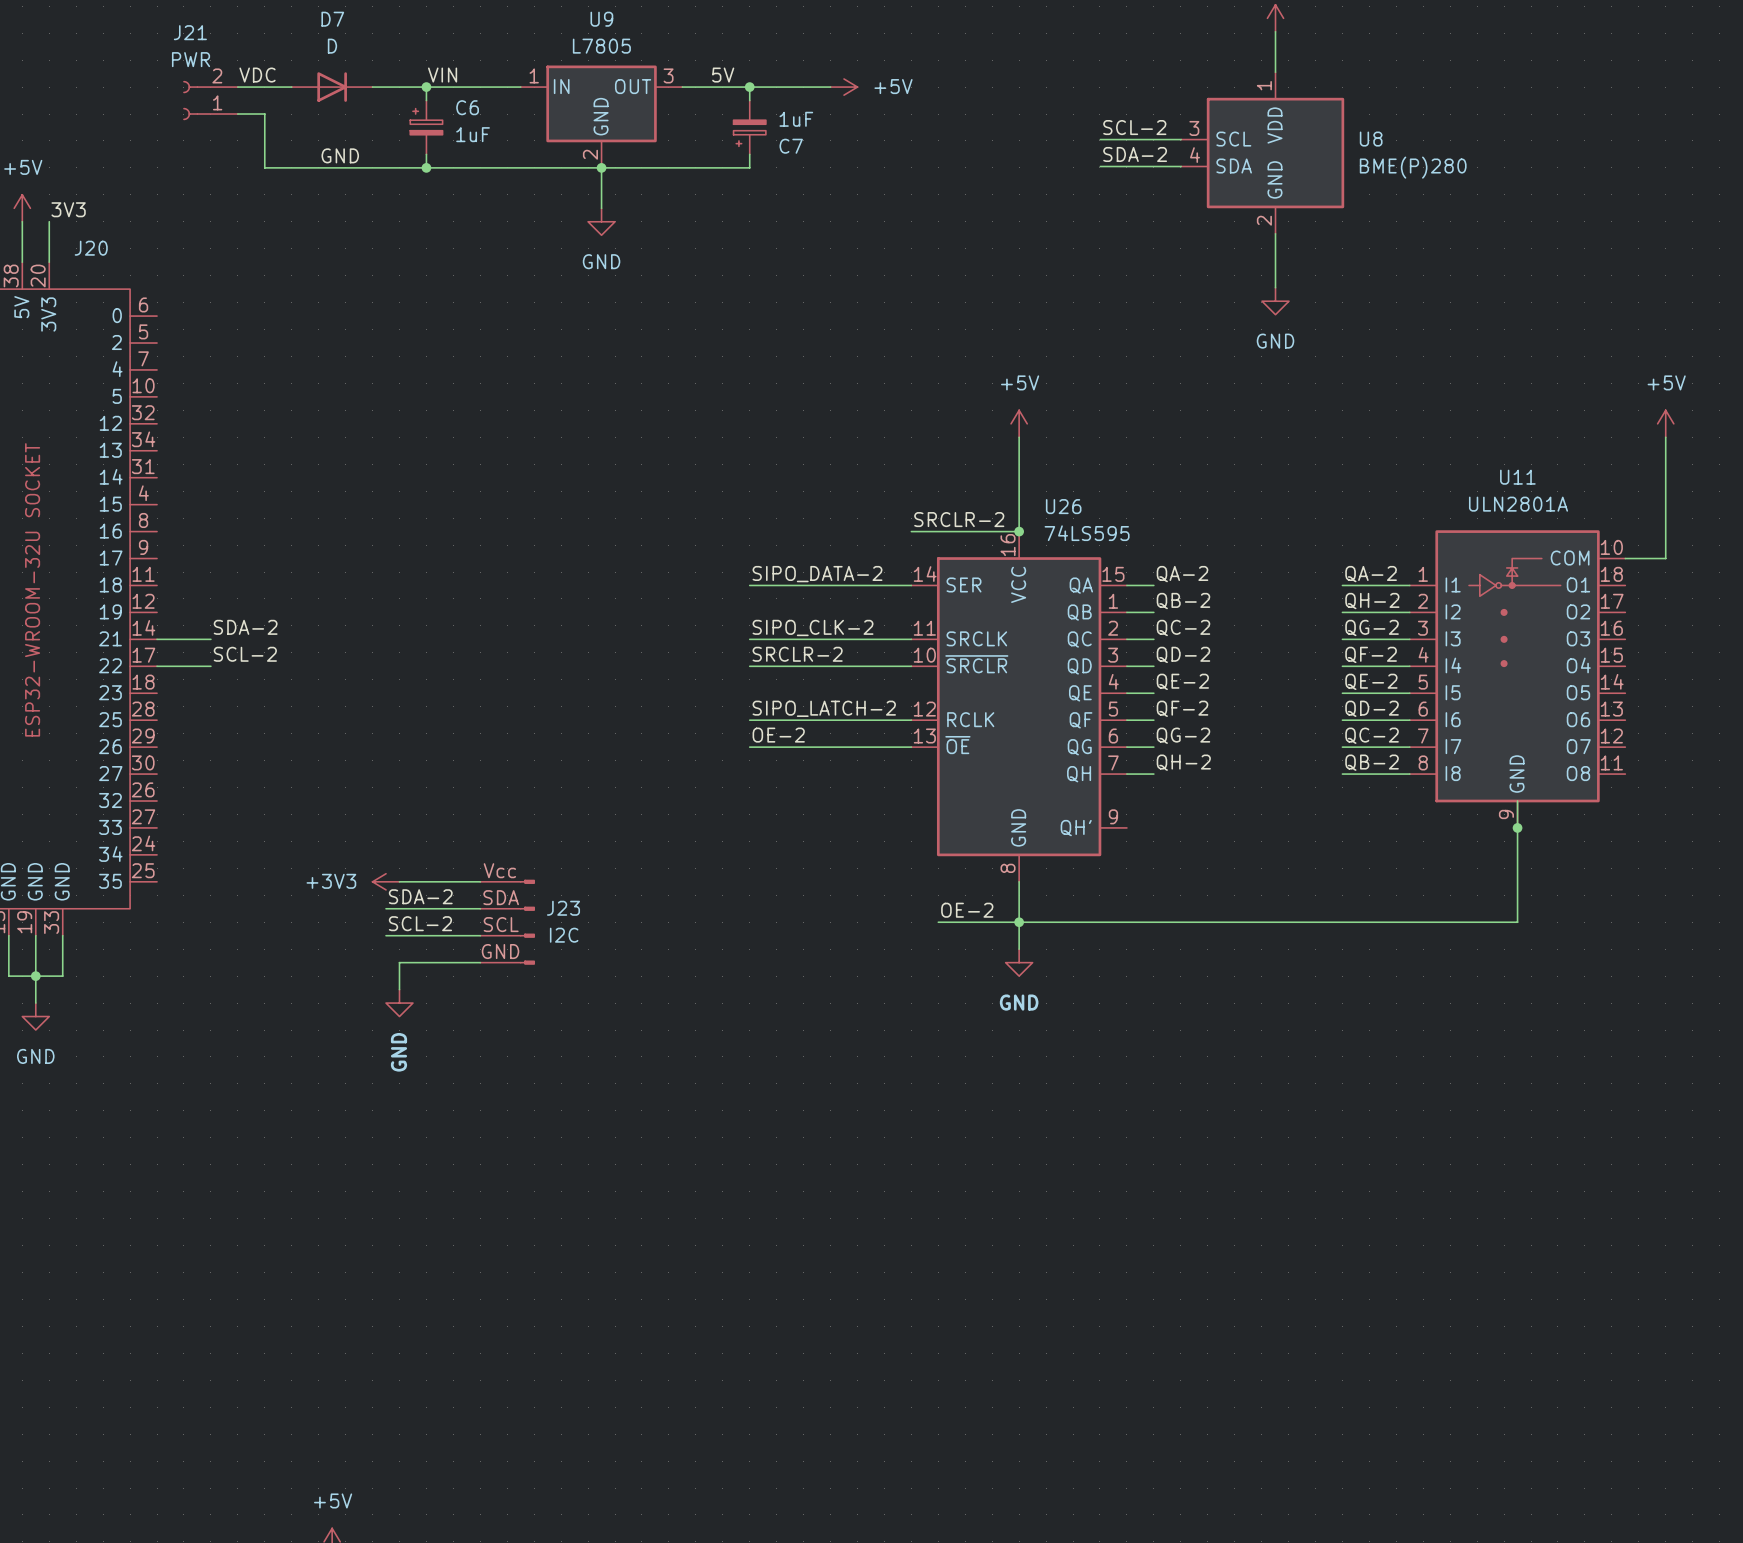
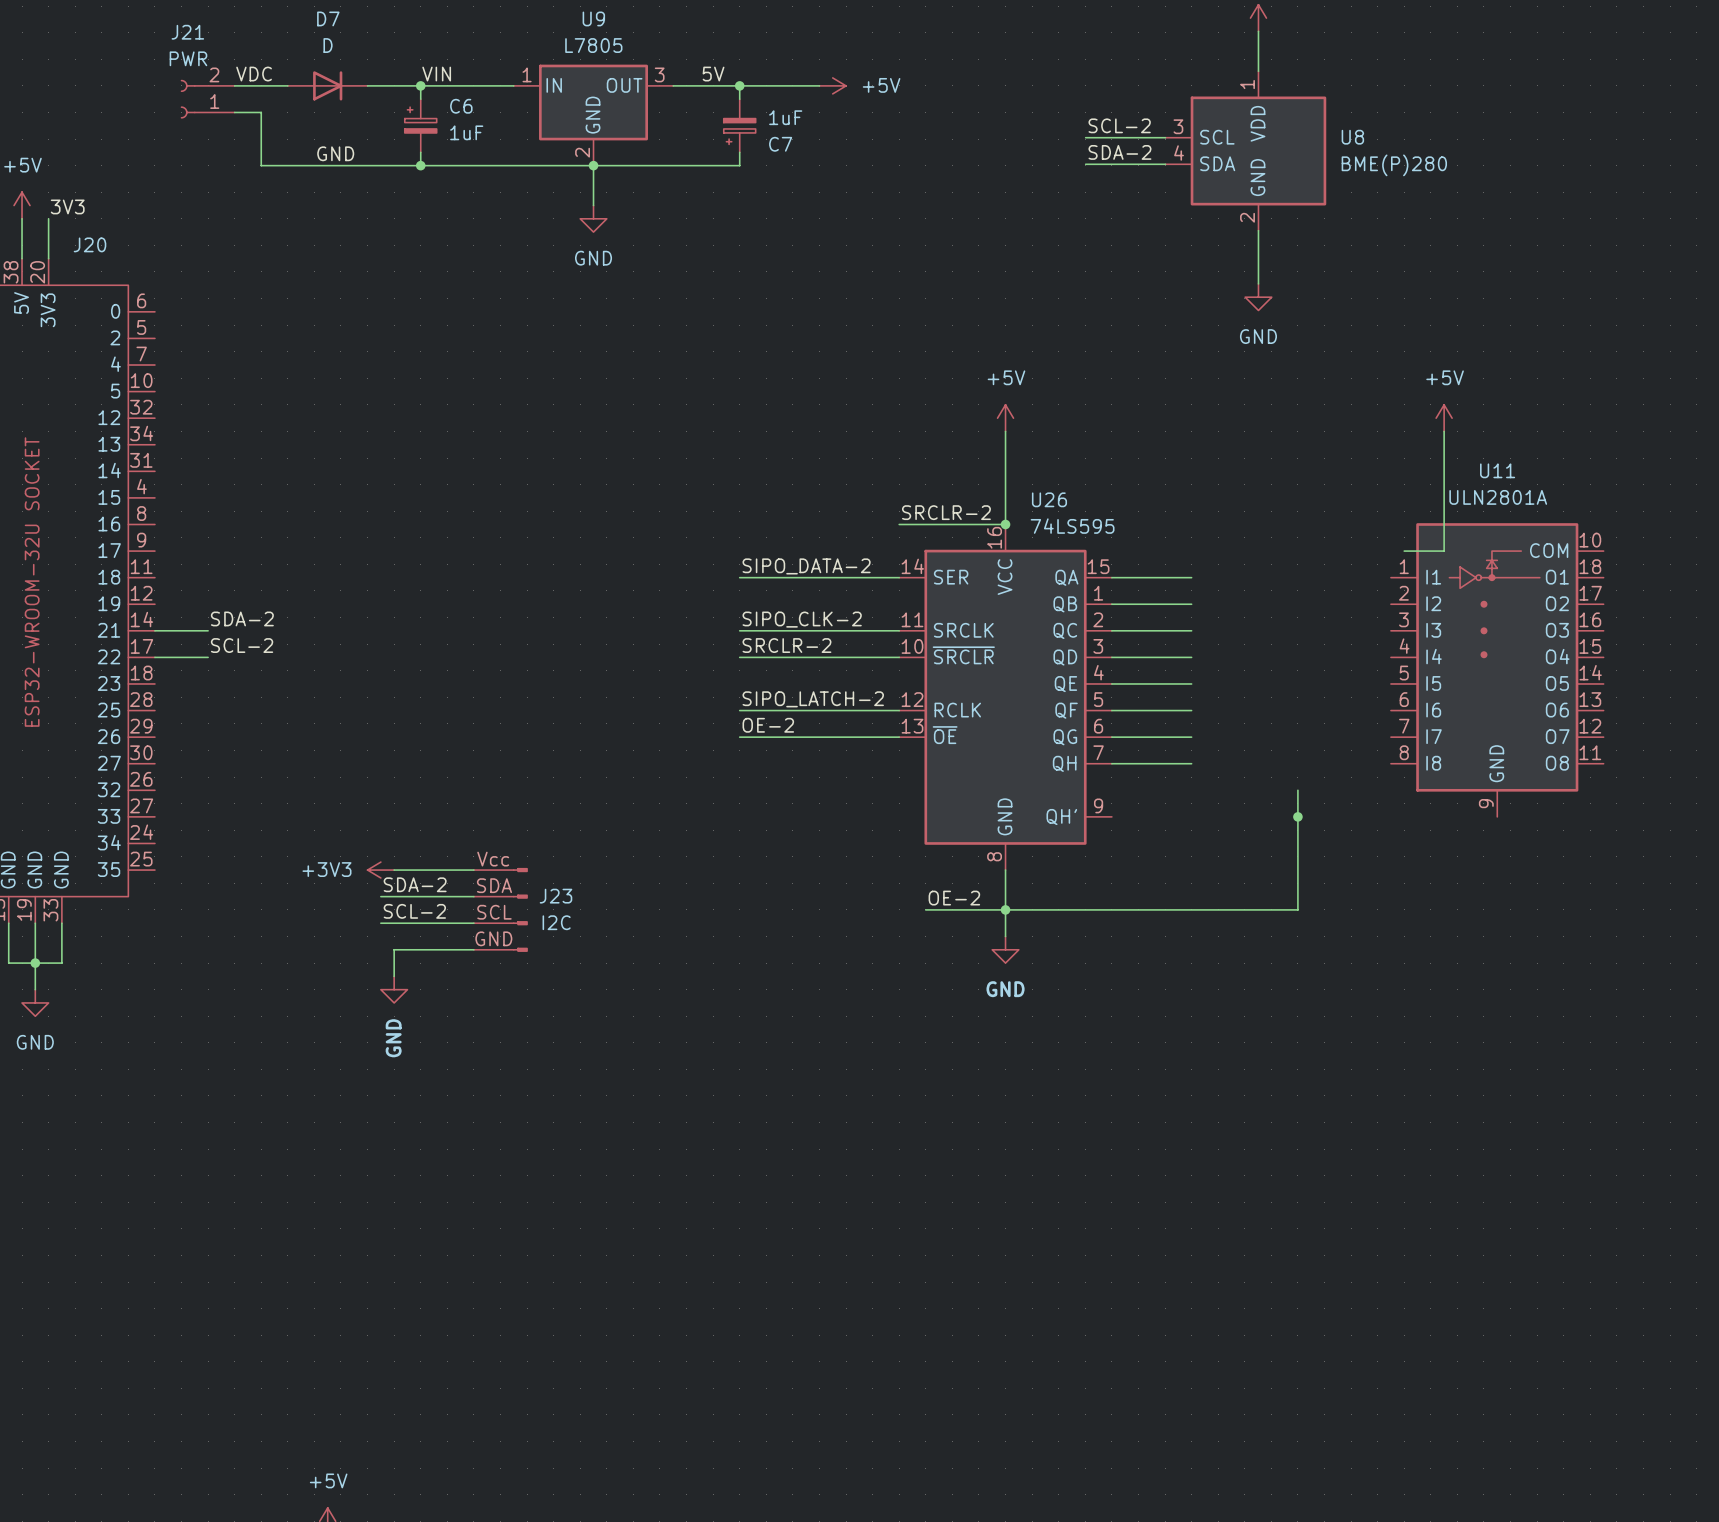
power symbol position: +5V (1665, 423) -> +5V (1444, 418)
wire: (1665, 437) (1665, 558) (1625, 558) -> (1444, 431) (1444, 551) (1404, 551)
label: QA-2 (1182, 574) -> none
label: QA-2 (1371, 574) -> none
wire: none -> (1138, 577) (1191, 577)
wire: (1342, 585) (1409, 585) -> none
label: QB-2 (1183, 601) -> none
label: QH-2 (1372, 601) -> none
wire: none -> (1138, 604) (1191, 604)
wire: (1342, 612) (1409, 612) -> none
label: QC-2 (1183, 627) -> none
label: QG-2 (1372, 627) -> none
wire: none -> (1138, 630) (1191, 630)
wire: (1342, 639) (1409, 639) -> none
label: QD-2 (1183, 654) -> none
label: QF-2 (1371, 654) -> none
wire: none -> (1138, 657) (1191, 657)
wire: (1342, 666) (1409, 666) -> none
label: QE-2 (1182, 681) -> none
label: QE-2 (1371, 681) -> none
wire: none -> (1138, 683) (1191, 683)
wire: (1342, 693) (1409, 693) -> none
label: QF-2 (1182, 708) -> none
label: QD-2 (1372, 708) -> none
wire: none -> (1138, 710) (1191, 710)
wire: (1342, 720) (1409, 720) -> none
label: QG-2 (1183, 735) -> none
label: QC-2 (1372, 735) -> none
wire: none -> (1138, 737) (1191, 737)
wire: (1342, 747) (1409, 747) -> none
label: QH-2 (1183, 762) -> none
label: QB-2 (1372, 762) -> none
wire: none -> (1138, 763) (1191, 763)
wire: (1342, 774) (1409, 774) -> none
wire: (1517, 801) (1517, 922) (1315, 922) -> (1297, 790) (1297, 909)
junction: none -> (1297, 816)
junction: (1517, 827) -> none

